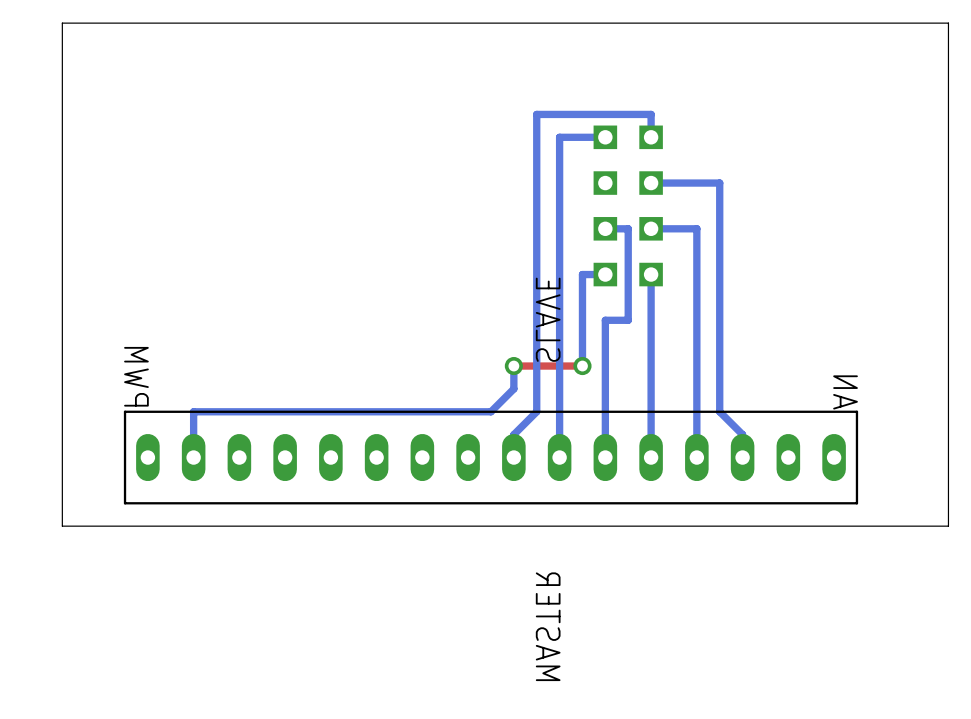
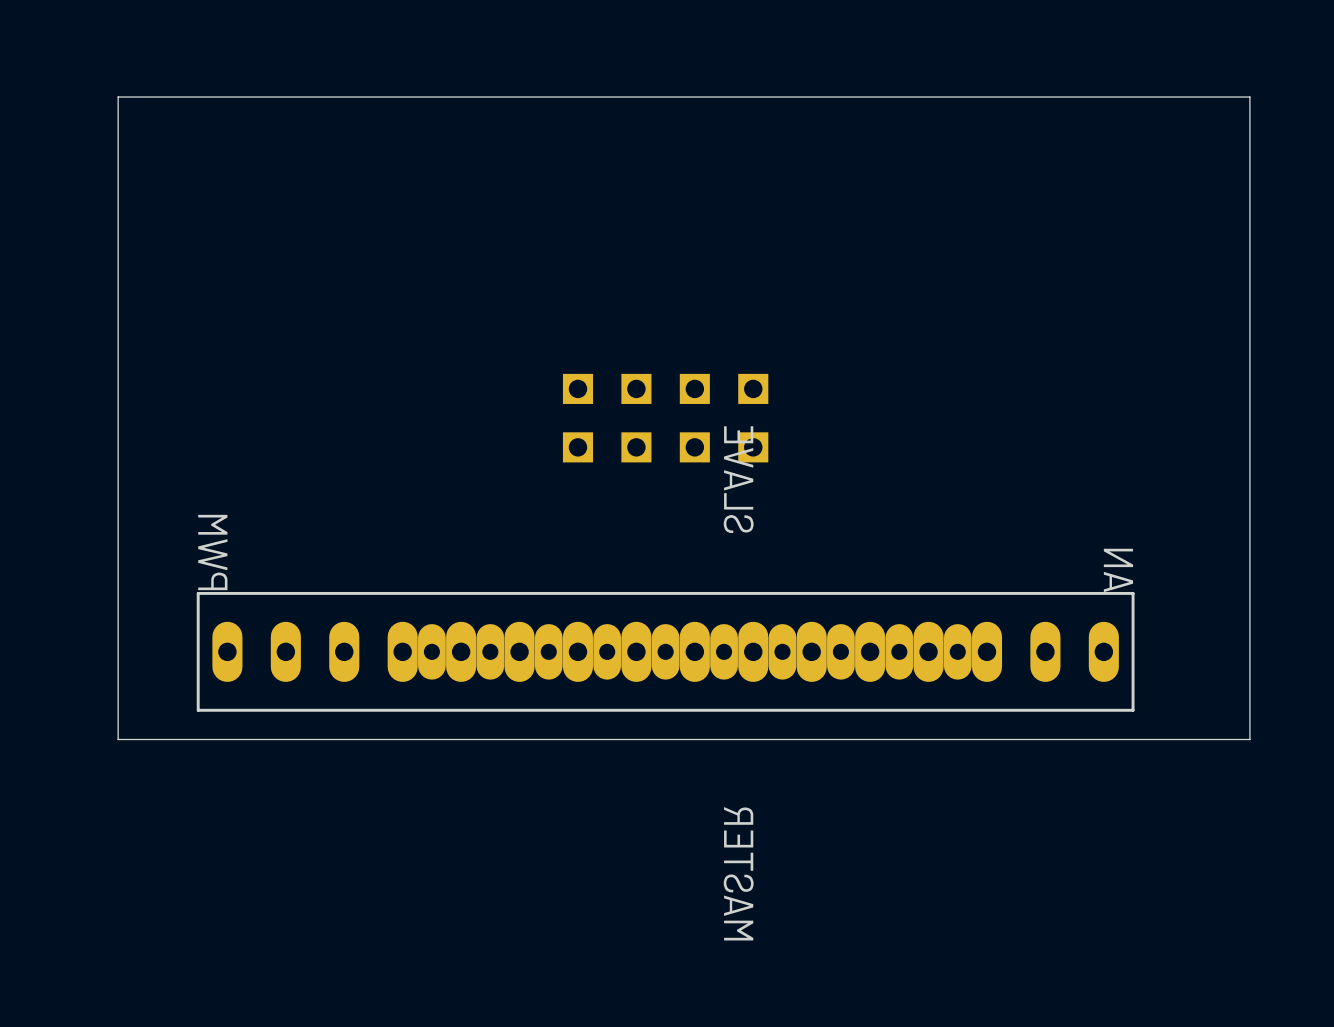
bottom track: (605, 137) (559, 137) (559, 457) -> none
bottom track: (651, 137) (651, 114) (536, 114) (536, 411) (513, 434) (513, 457) -> none
bottom track: (651, 183) (719, 183) (719, 411) (742, 434) (742, 457) -> none
part rotation: 0° (628, 205) -> 90° clockwise (665, 418)
part position: (628, 205) -> (665, 418)
bottom track: (605, 228) (628, 228) (628, 320) (605, 320) (605, 457) -> none
bottom track: (651, 228) (696, 228) (696, 457) -> none
bottom track: (605, 274) (582, 274) (582, 366) -> none
bottom track: (651, 274) (651, 457) -> none
bottom track: (513, 366) (513, 388) (490, 411) (193, 411) (193, 457) -> none
via: (513, 366) -> none
top track: (582, 366) (513, 366) -> none
via: (582, 366) -> none
part: none -> (694, 651)

